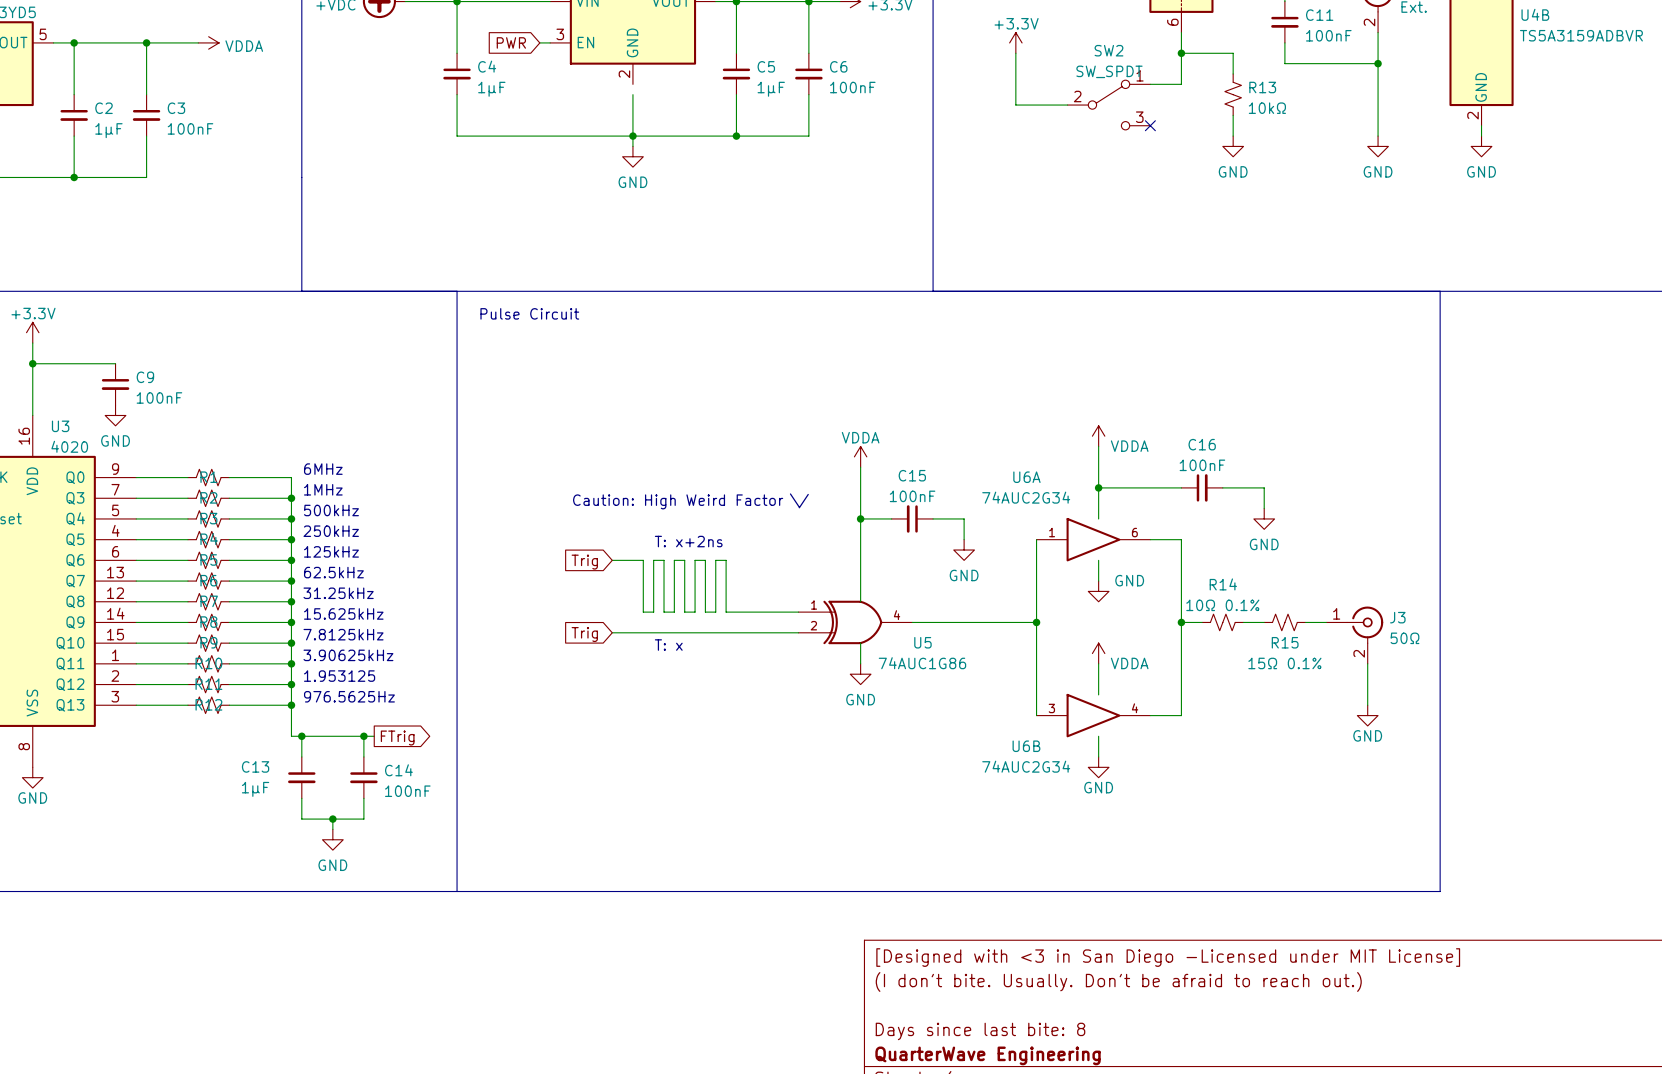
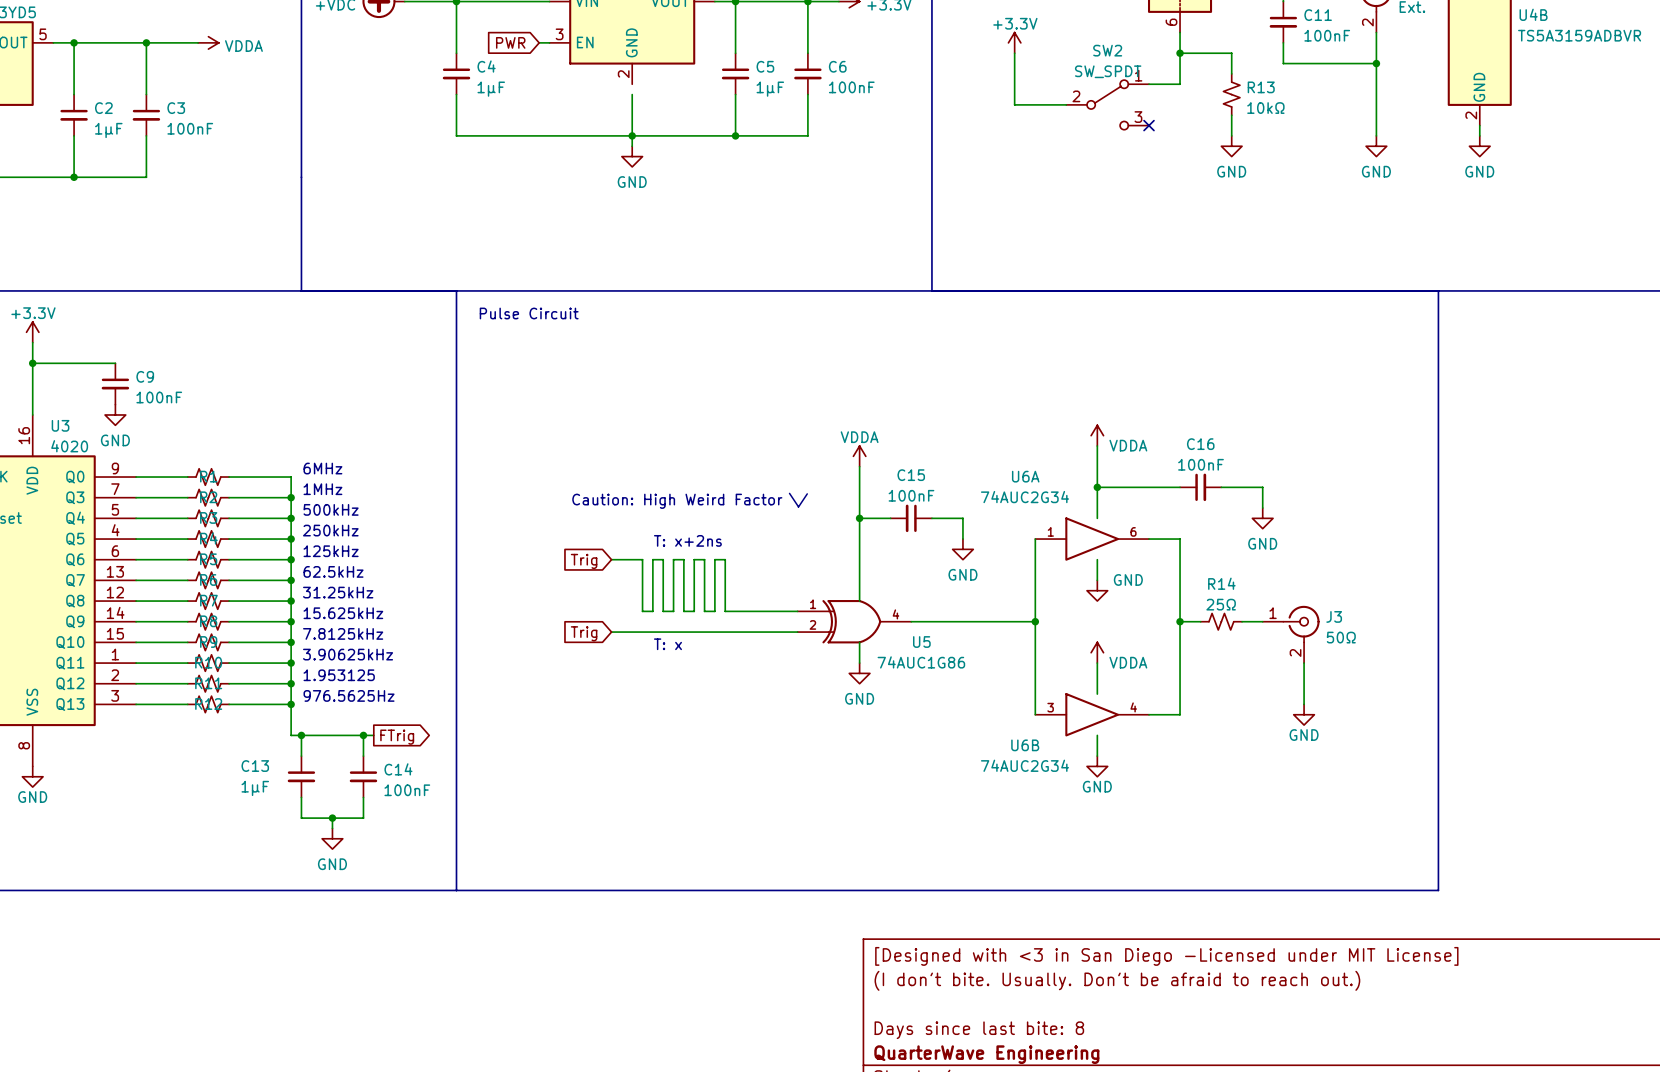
R14 value: 10Ω 0.1% (1222, 605) -> 25Ω (1221, 604)
R15: 15Ω 0.1% (1284, 622) -> none
wire: (1305, 622) (1326, 622) -> none
J3 position: (1354, 635) -> (1291, 634)
wire: (1367, 663) (1367, 705) -> (1304, 663) (1304, 704)
power symbol position: GND (1367, 715) -> GND (1304, 714)

